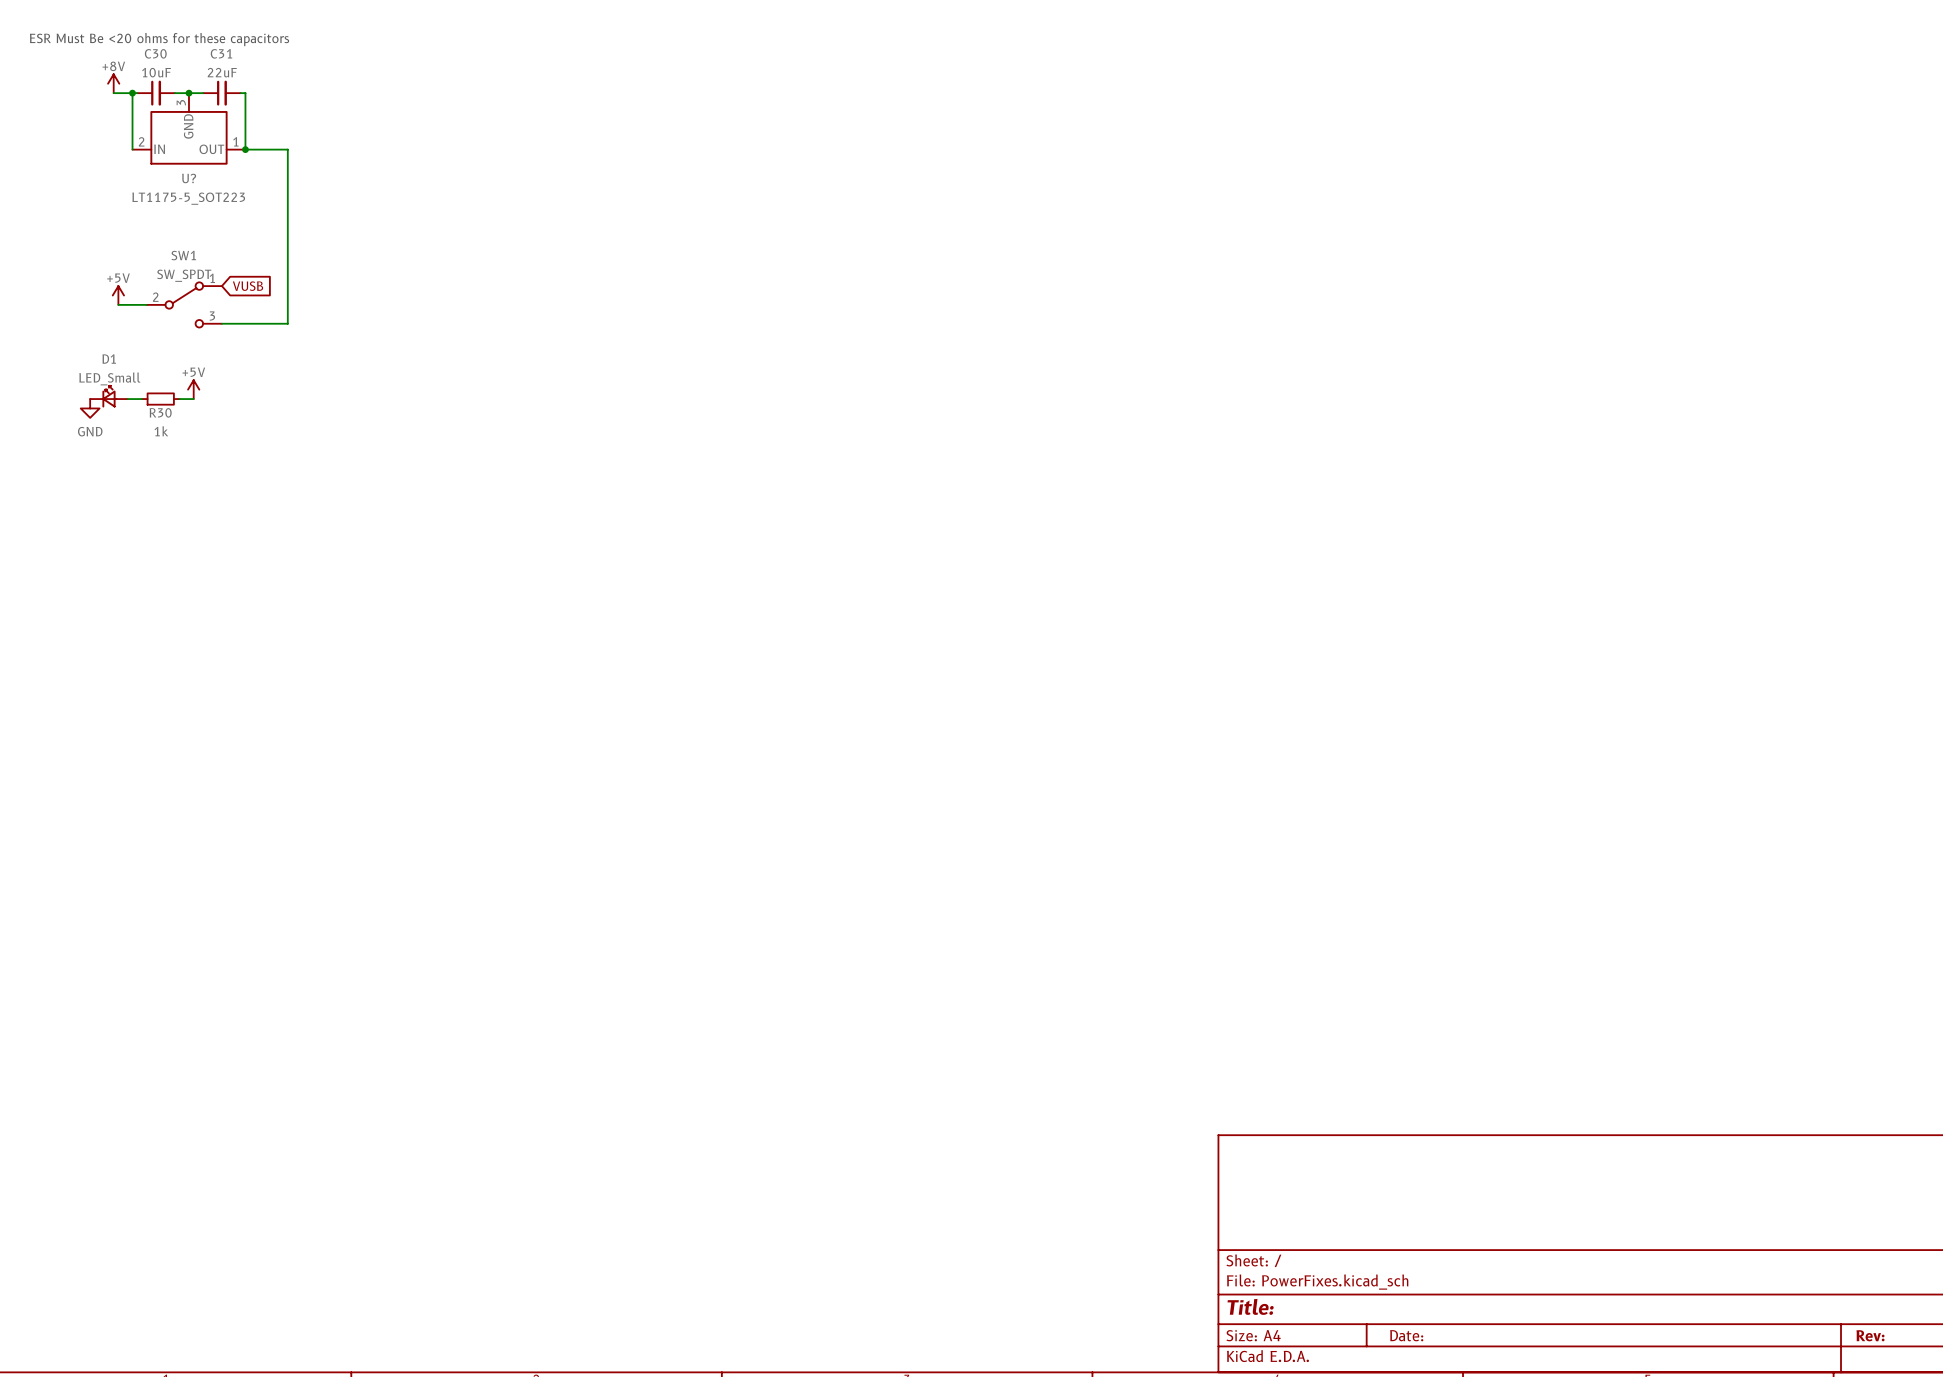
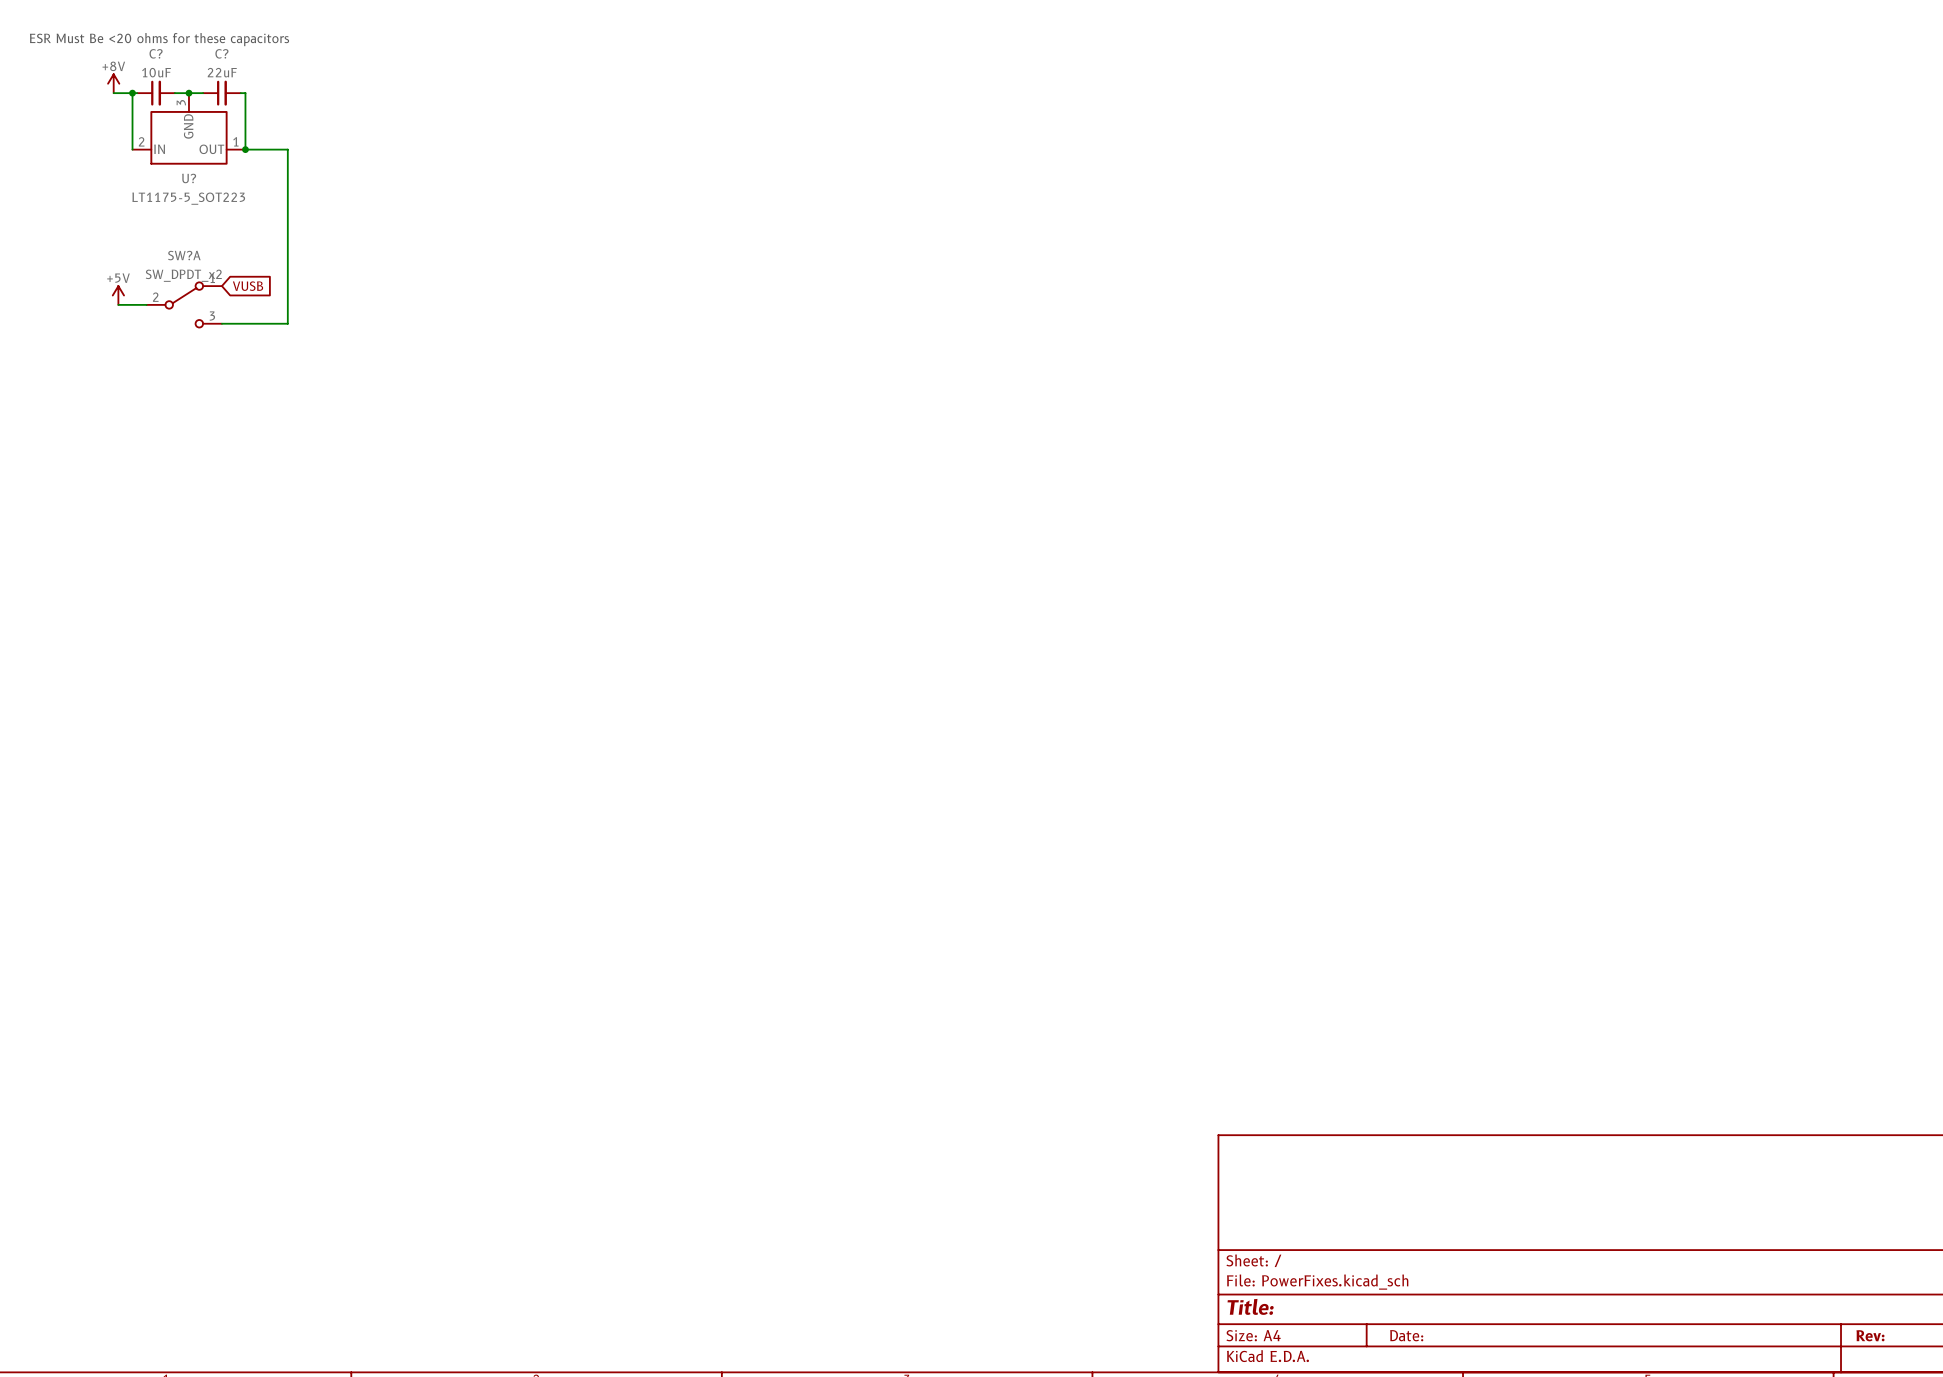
C30 name: C30 (155, 53) -> C? (156, 53)
C31 name: C31 (221, 53) -> C? (221, 53)
SW1 name: SW1 (183, 255) -> SW?A (184, 255)
SW1 value: SW_SPDT (184, 275) -> SW_DPDT_x2 (183, 275)
power symbol: +5V (193, 389) -> none
D1: LED_Small (108, 396) -> none
wire: (127, 399) (141, 399) -> none
R30: 1k (160, 399) -> none
wire: (179, 399) (193, 399) -> none
power symbol: GND (90, 408) -> none

